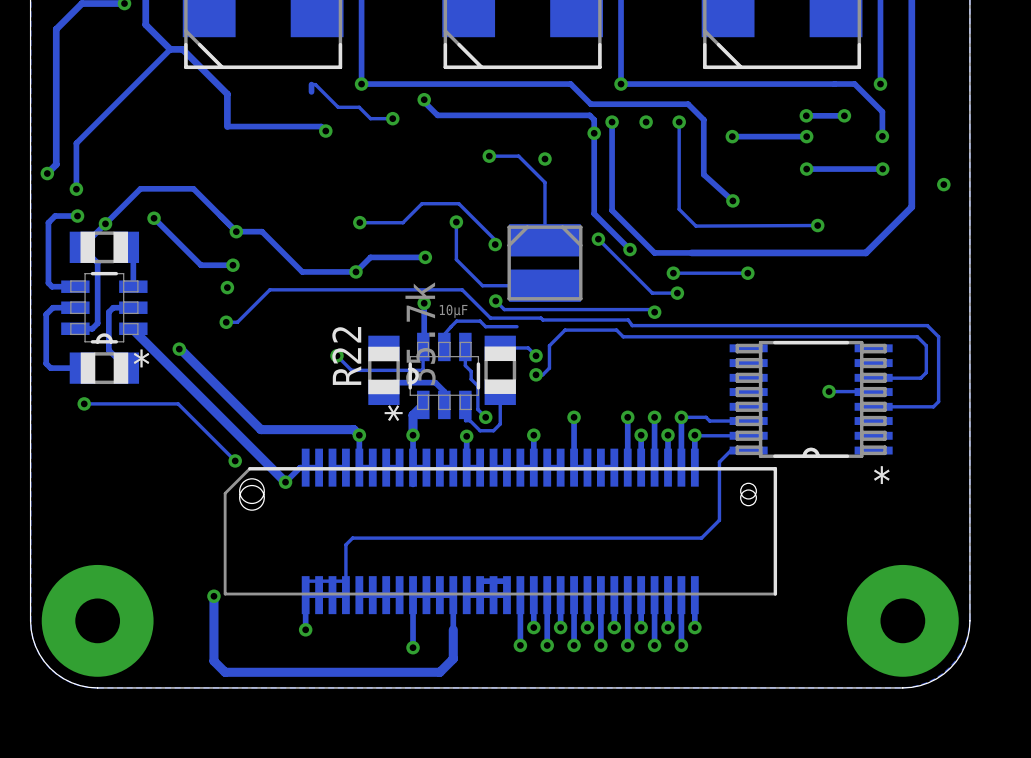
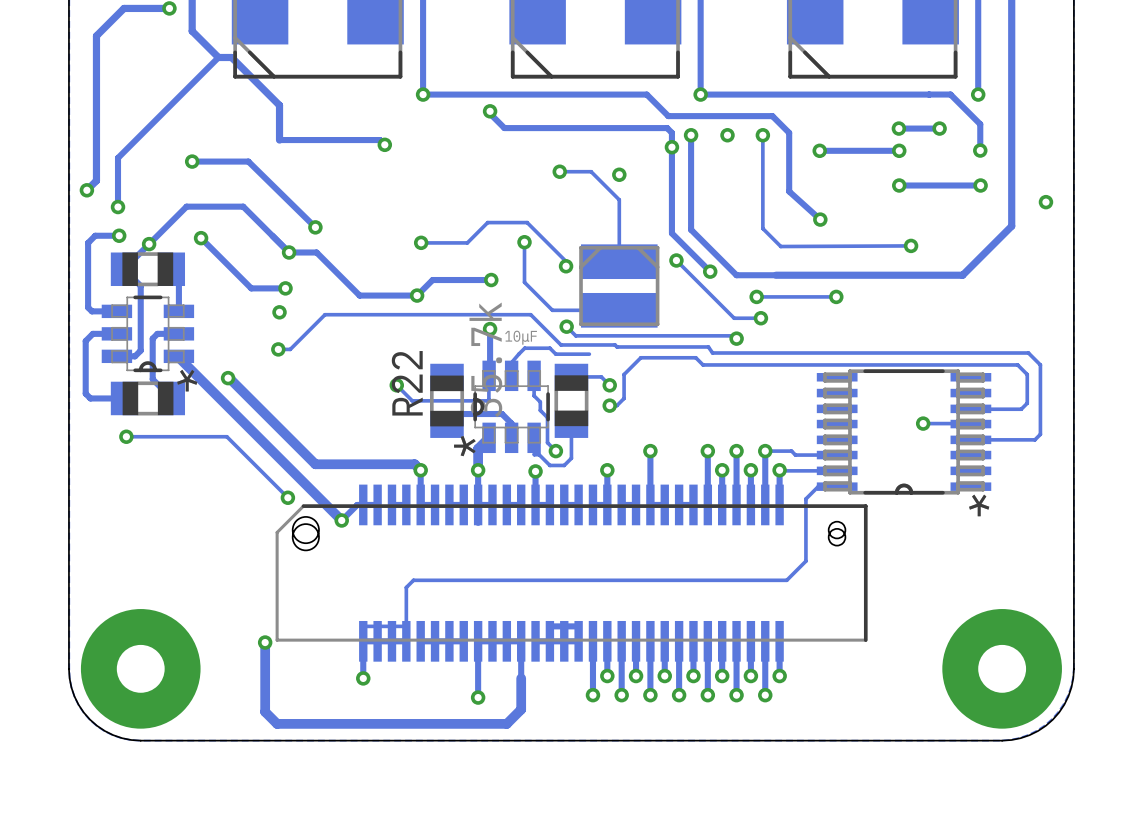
track: (311, 91) (311, 84) (315, 84) (338, 107) (359, 107) (370, 118) (392, 118) -> none
via: (392, 118) -> none
track: none -> (192, 161) (248, 161) (315, 227)
via: none -> (192, 161)
via: none -> (315, 227)

